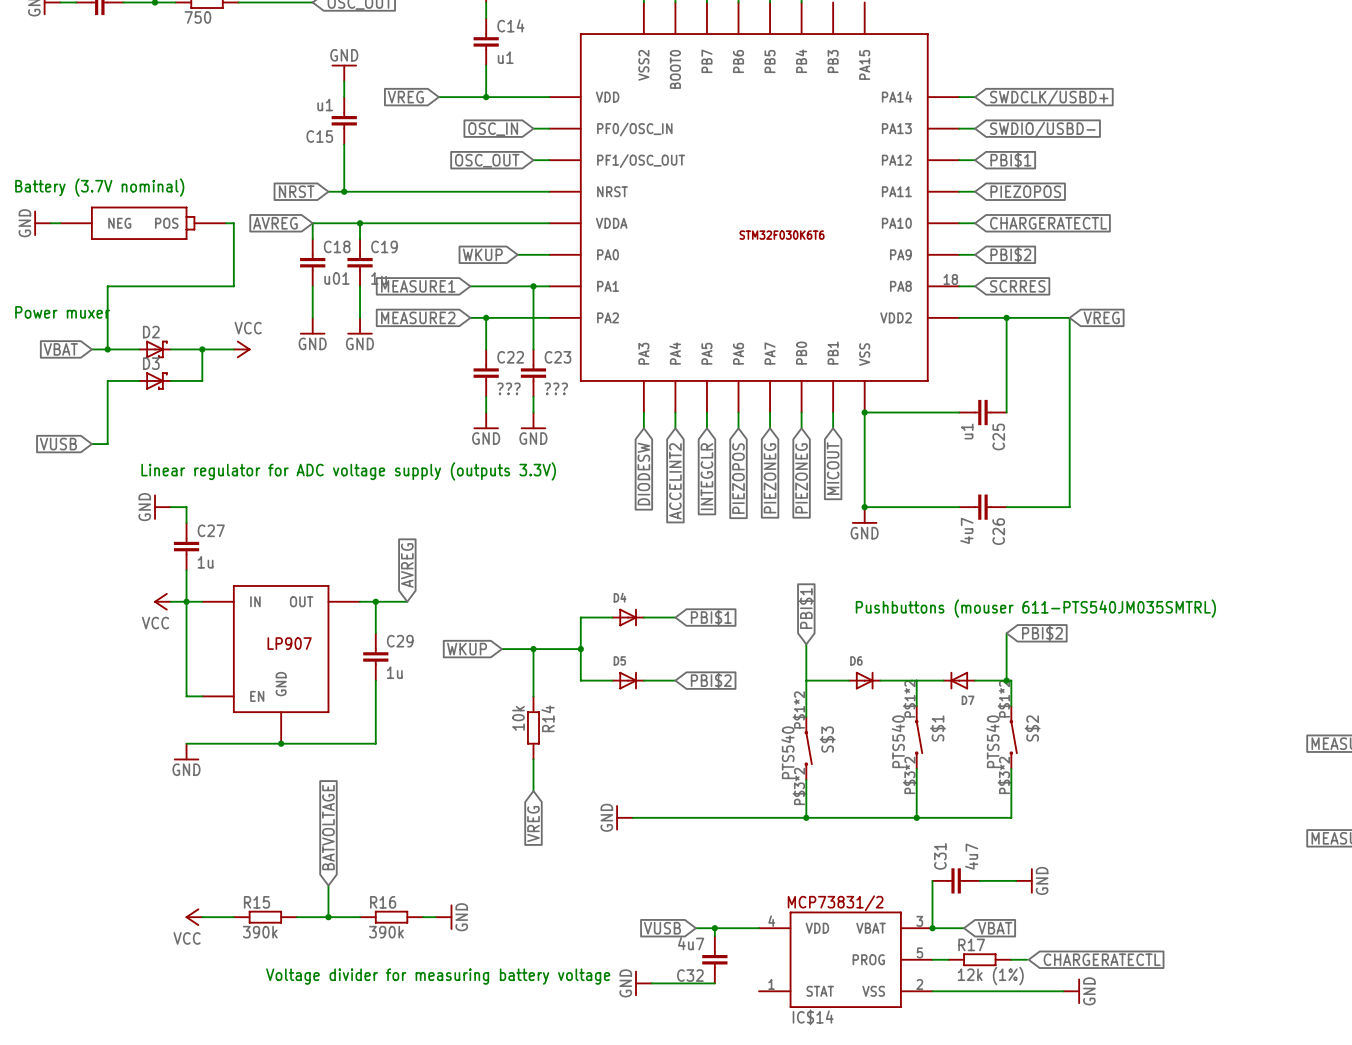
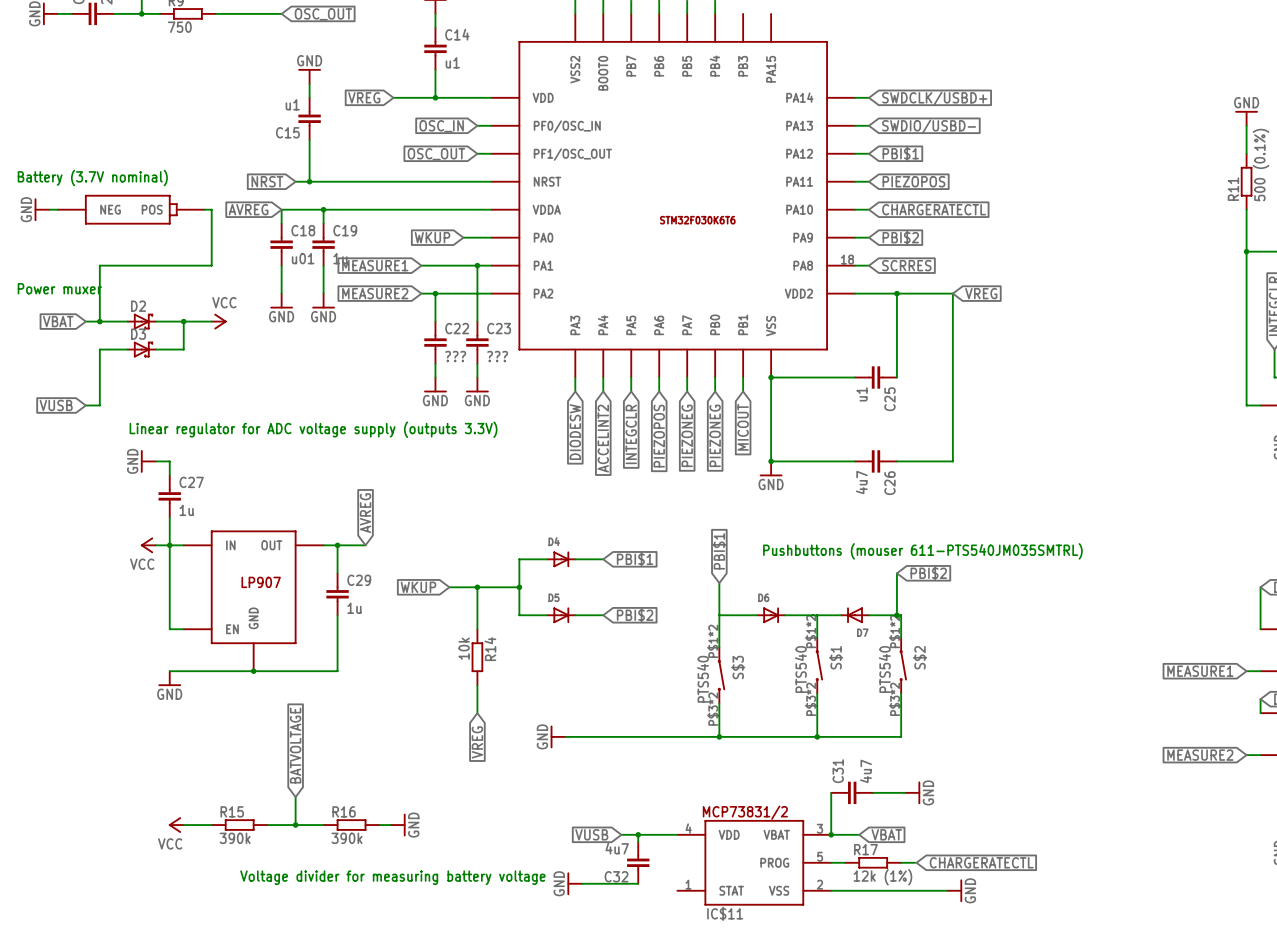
IC$14 name: IC$14 (813, 1017) -> IC$11 (725, 913)

